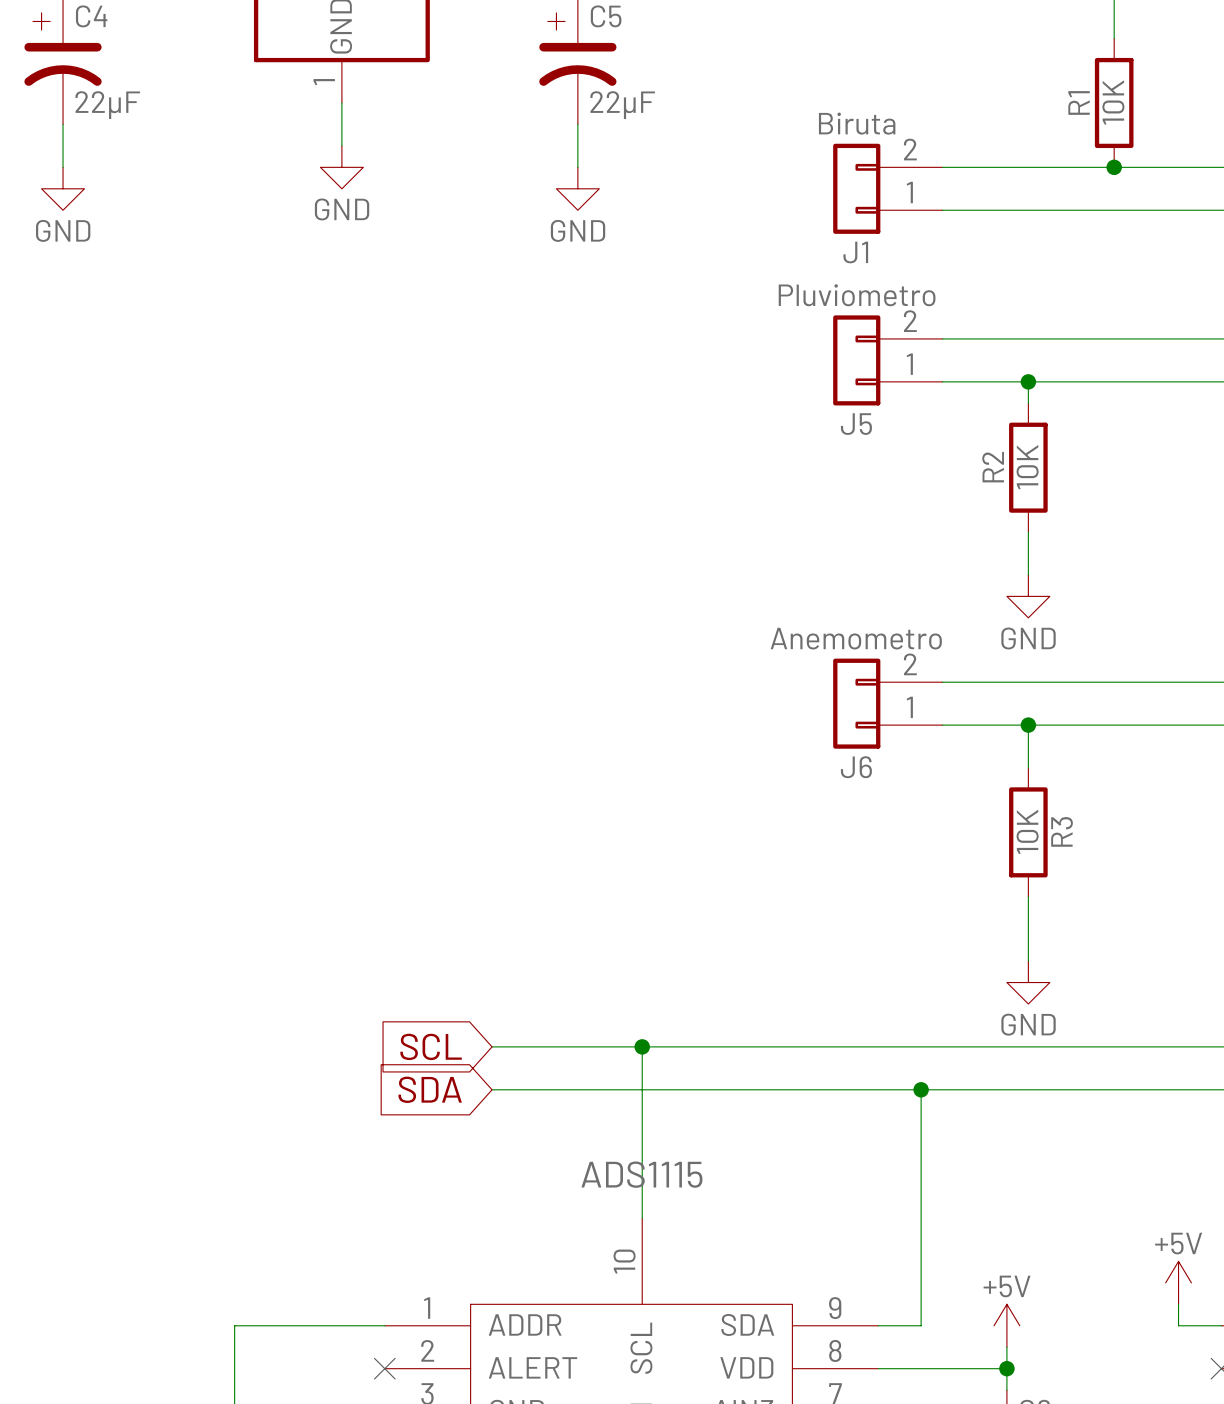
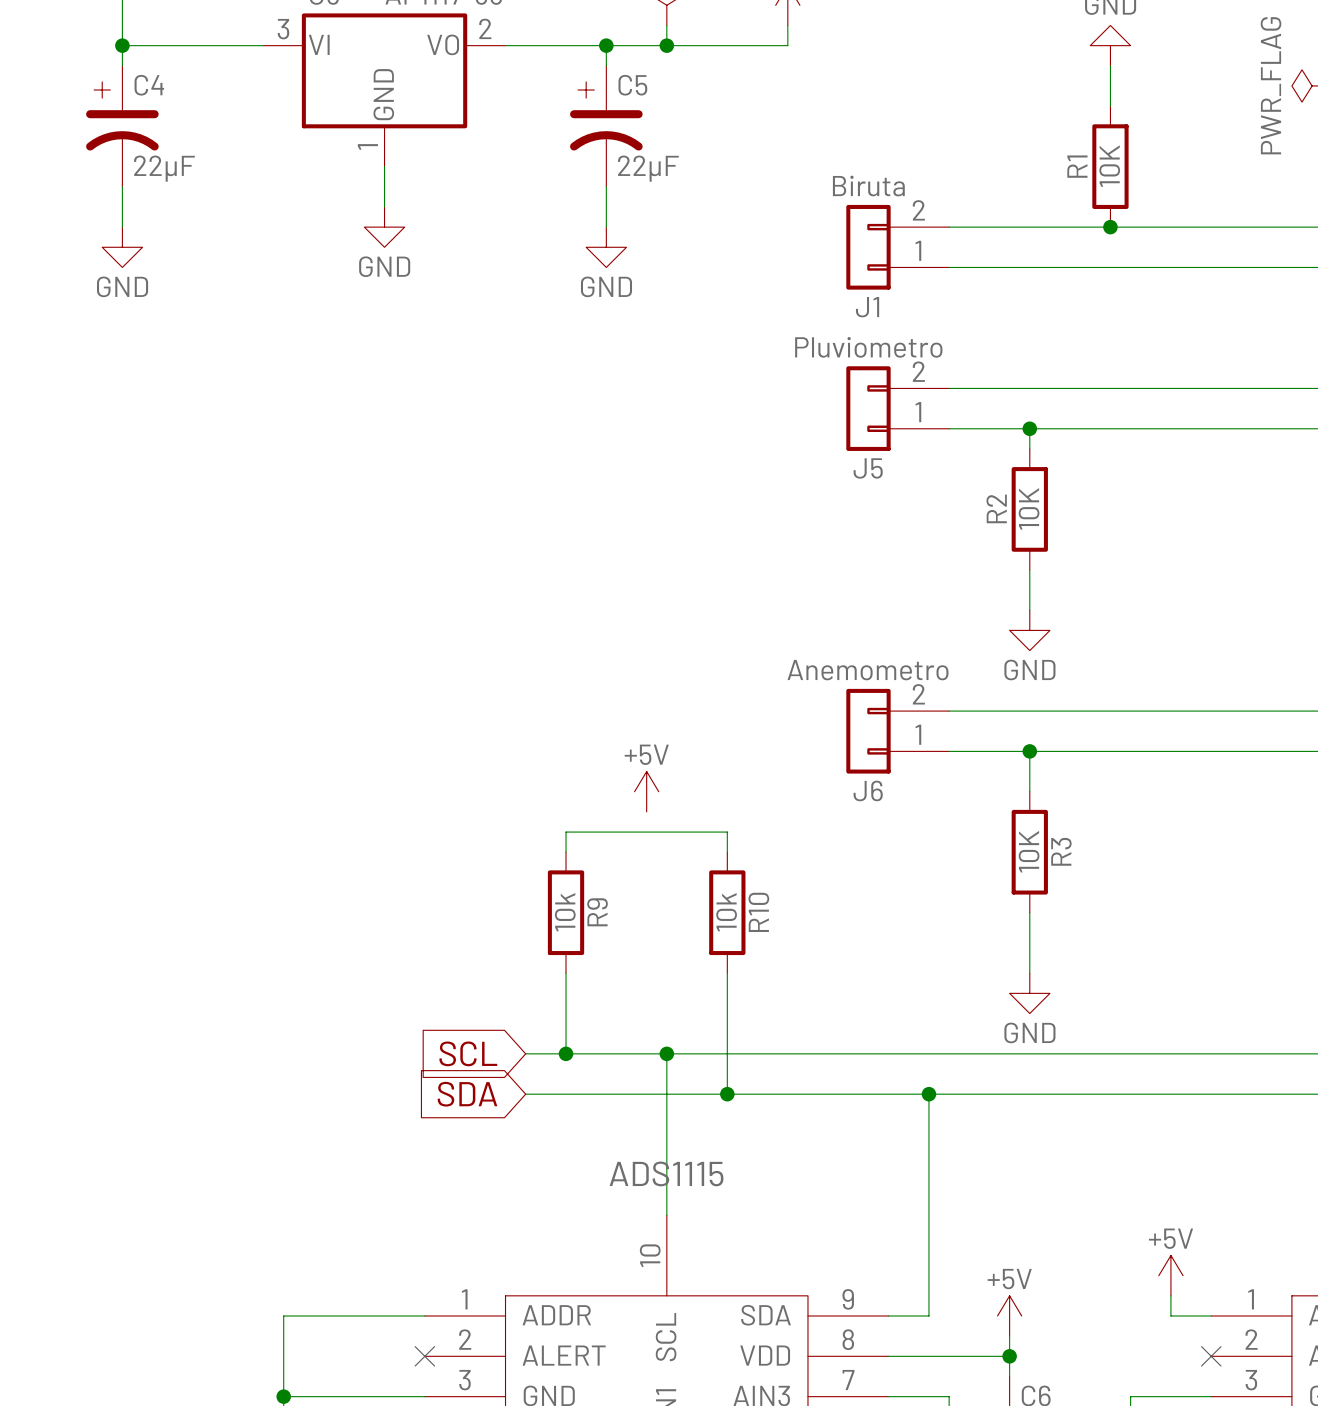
power symbol: none -> +5V (646, 791)
wire: none -> (566, 852) (566, 832) (727, 832) (727, 852)
R9: none -> 10k (566, 912)
R10: none -> 10k (727, 912)
wire: none -> (566, 973) (566, 1053)
wire: none -> (727, 973) (727, 1094)
junction: none -> (566, 1053)
junction: none -> (727, 1094)

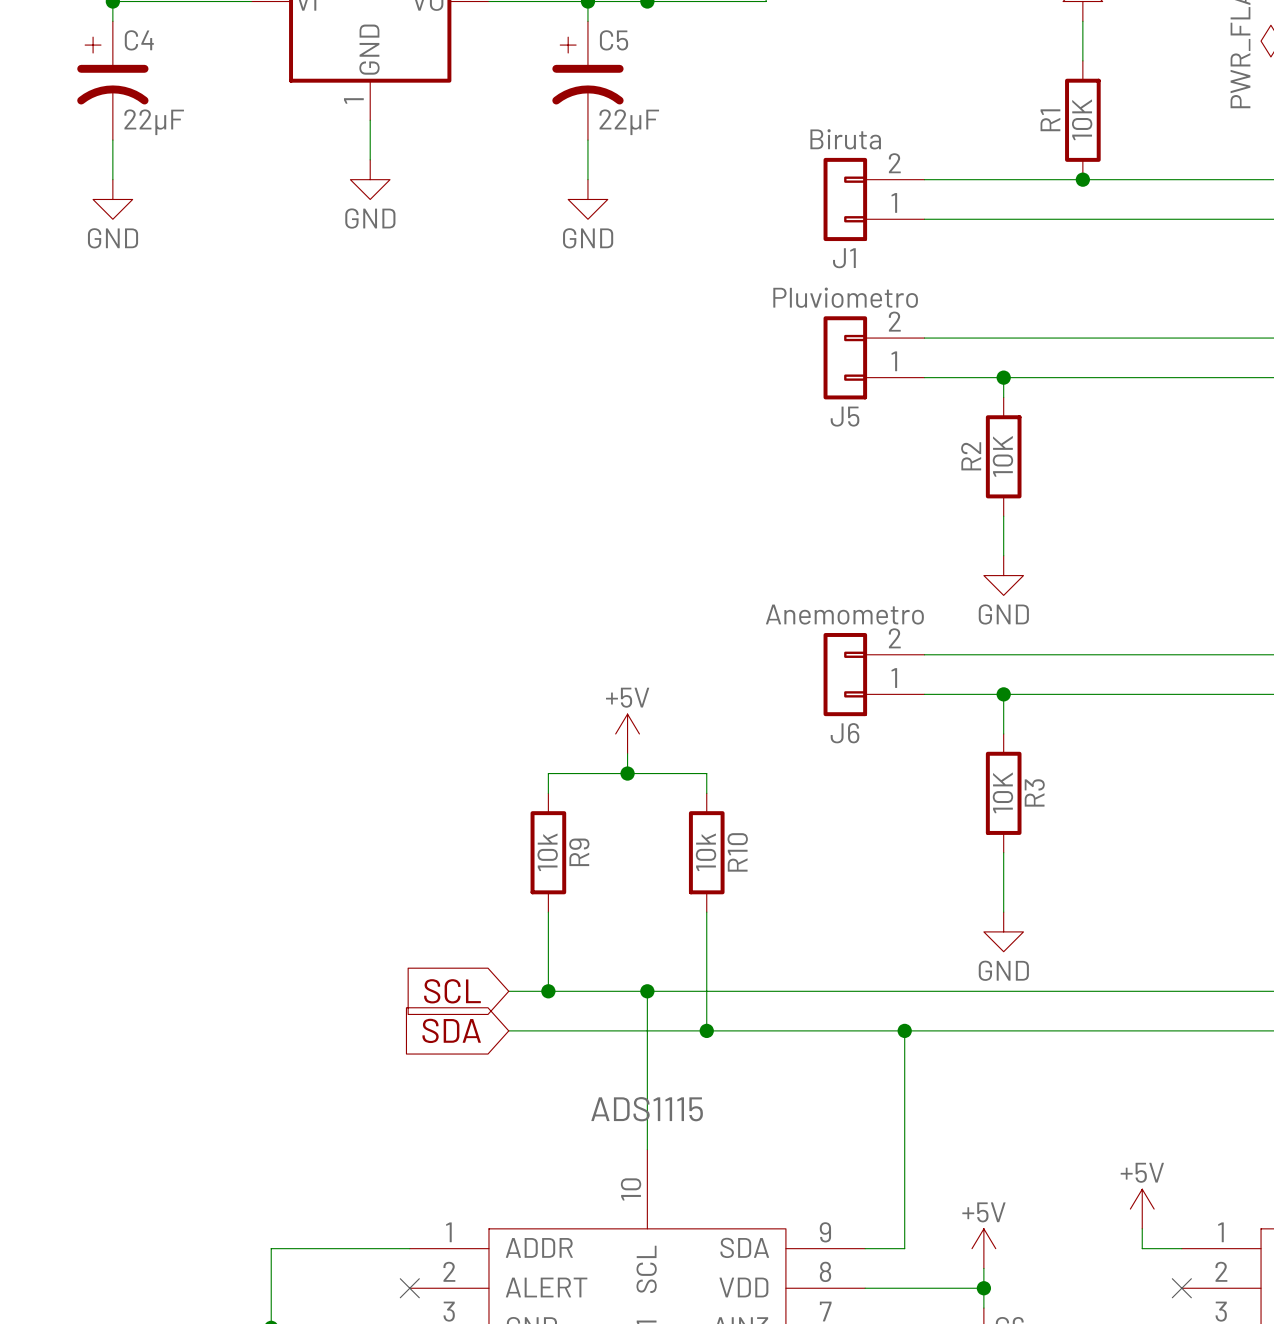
wire: none -> (627, 753) (627, 773)
junction: none -> (627, 773)

